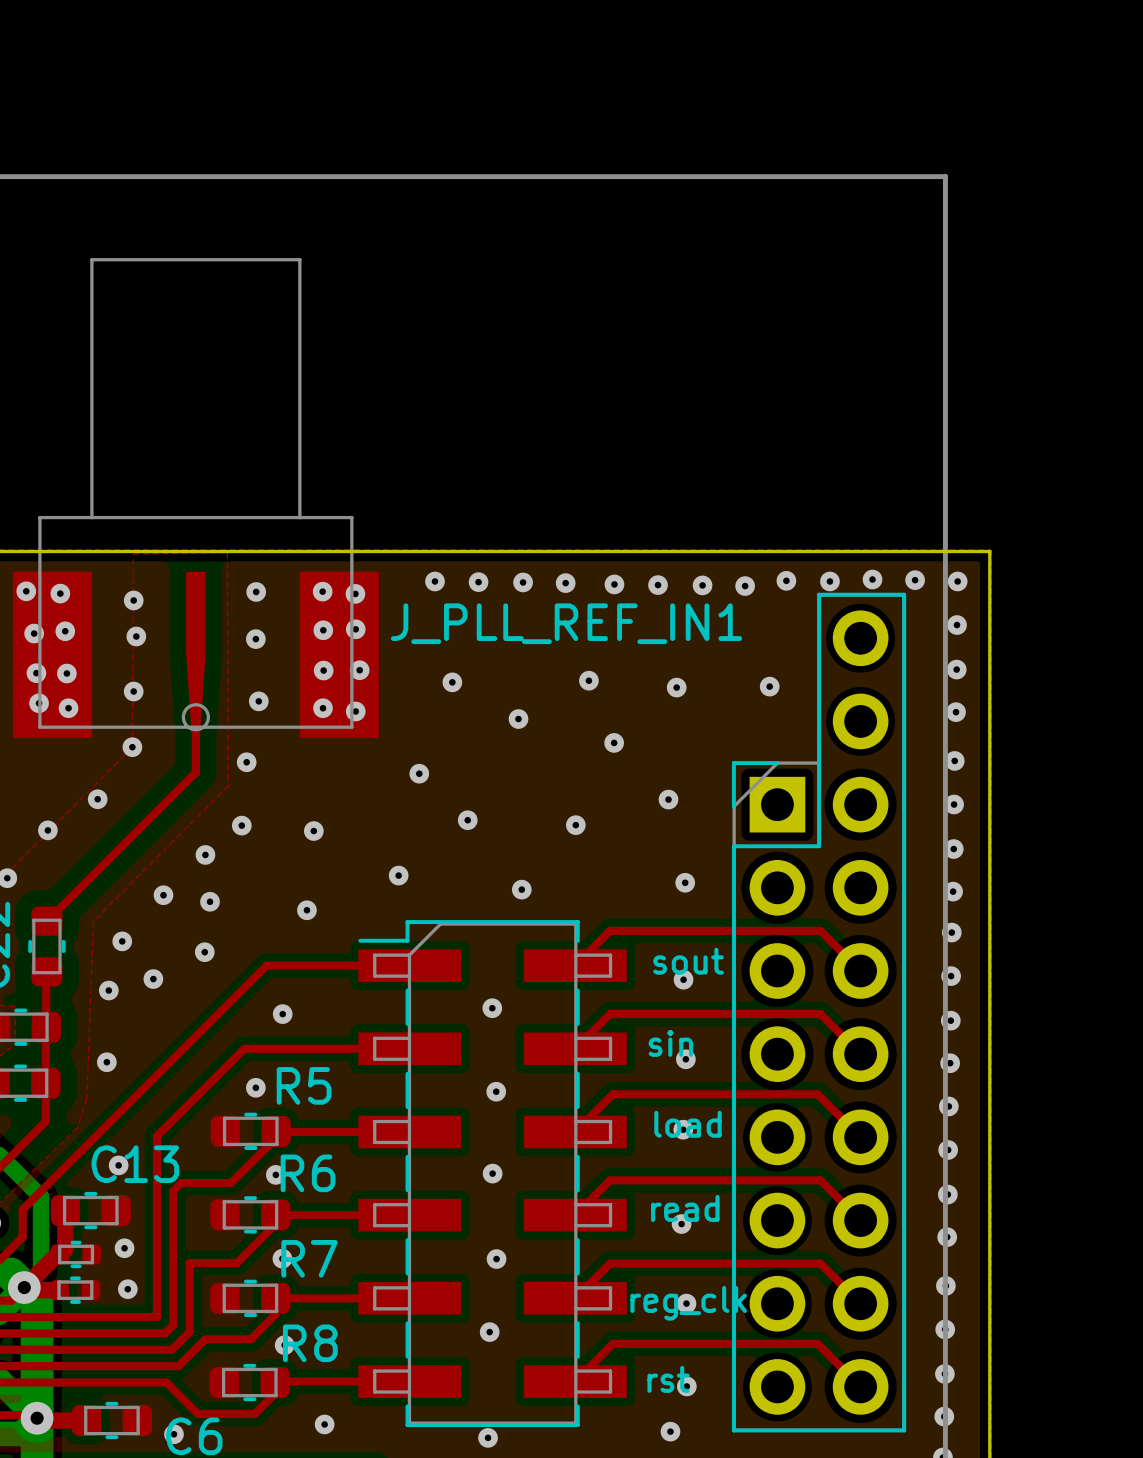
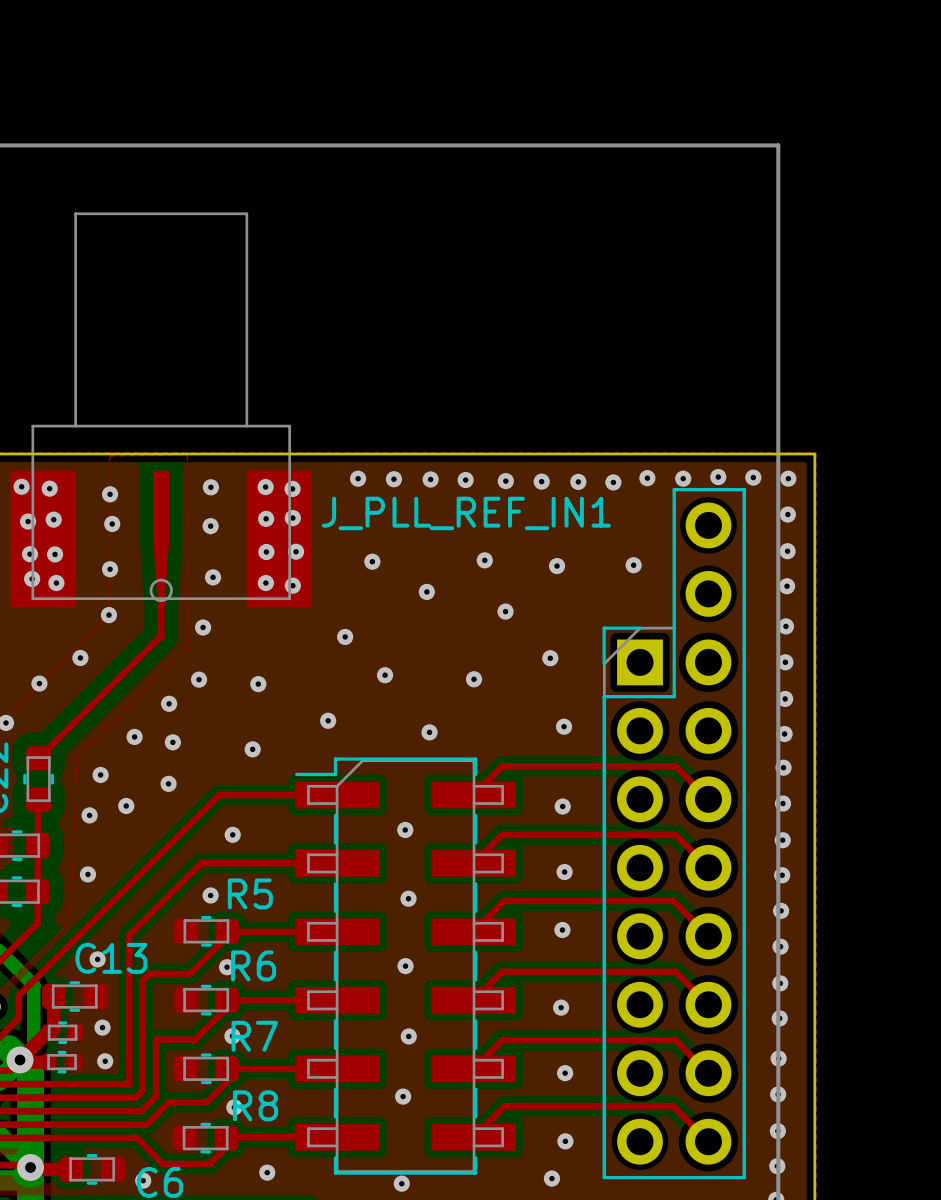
text: sout (688, 961) -> none
text: sin (670, 1043) -> none
text: load (688, 1124) -> none
text: read (685, 1208) -> none
text: reg_clk (688, 1303) -> none
text: rst (668, 1379) -> none

